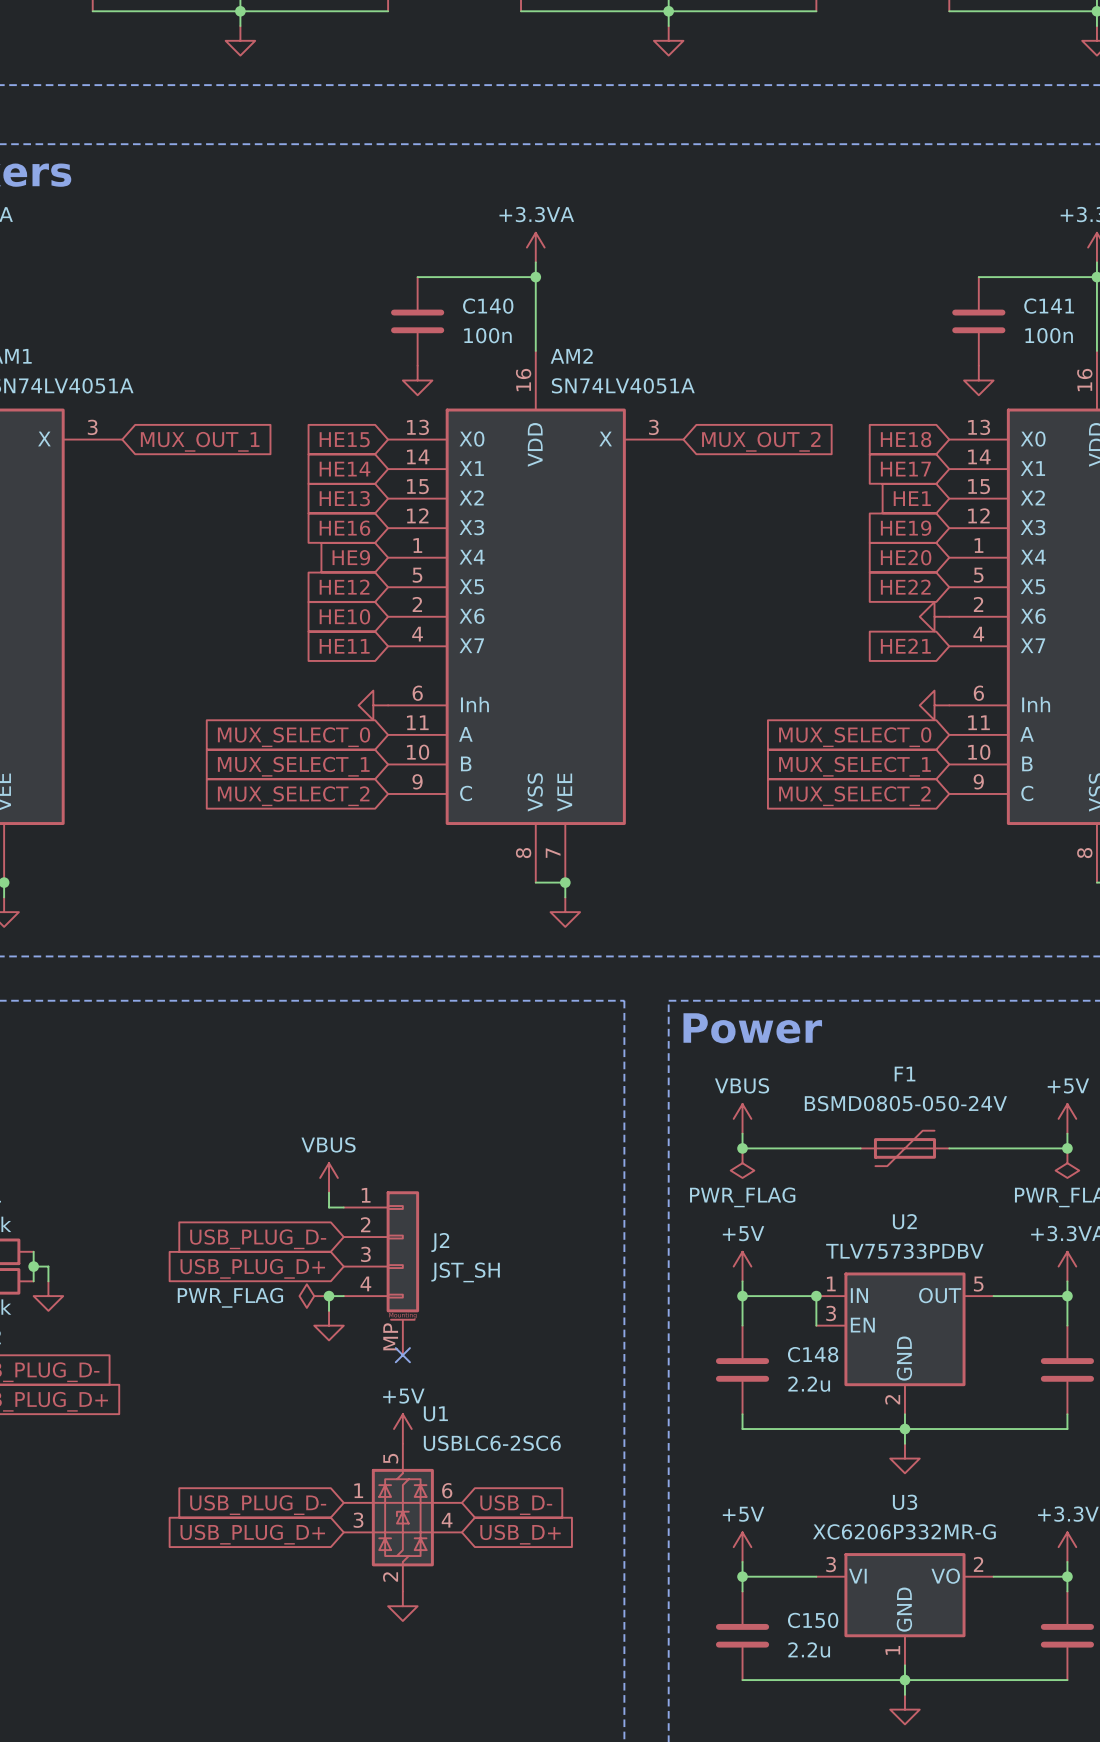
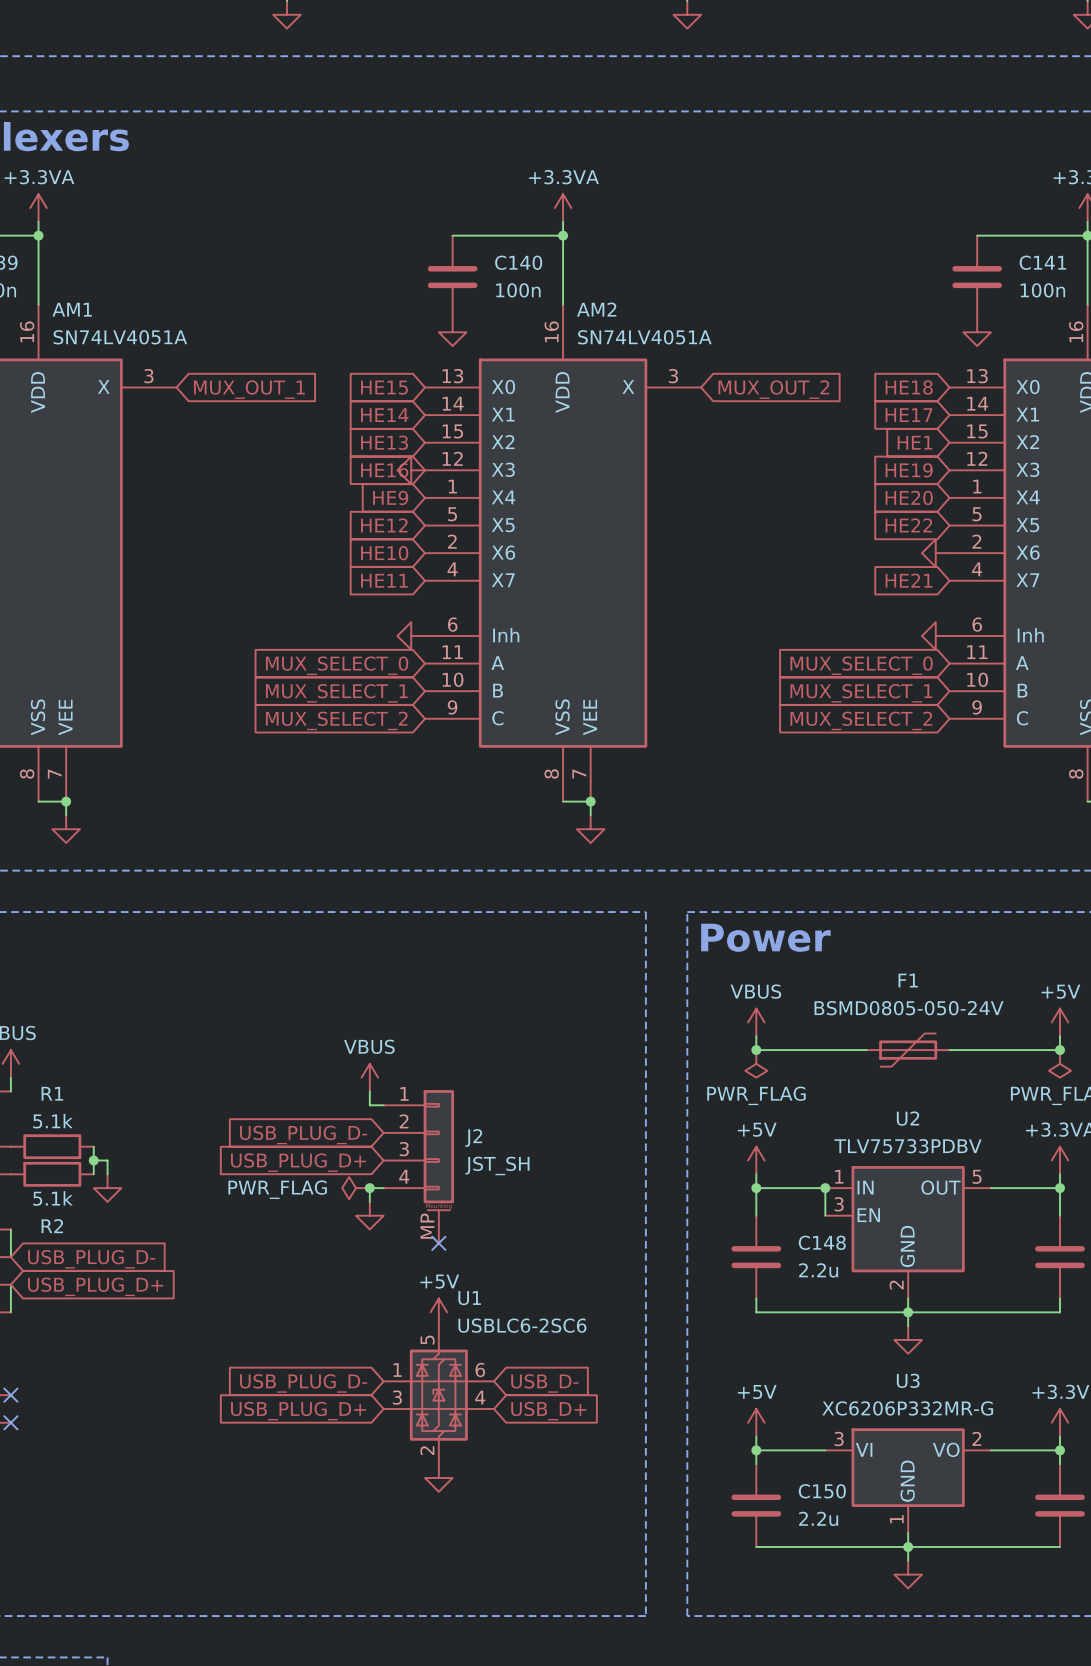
power symbol: none -> (411, 470)

